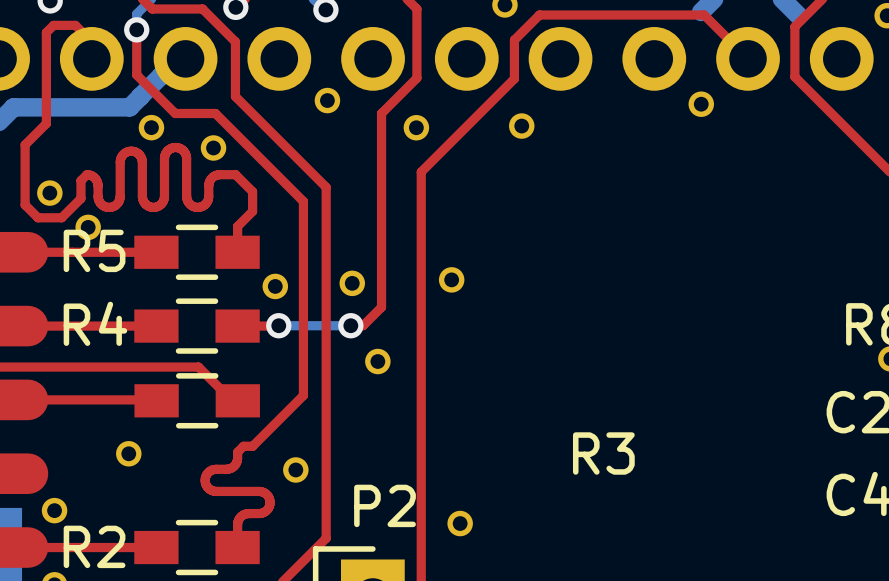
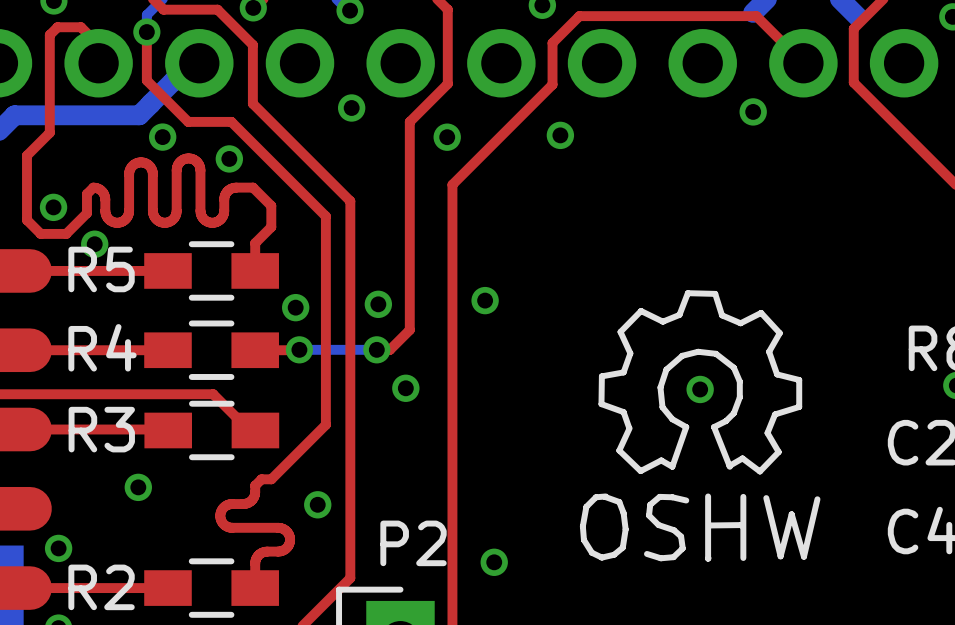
drawing: none -> [579, 290, 821, 562]
part: none -> (700, 389)
R3 name position: R3 (603, 453) -> R3 (101, 429)

